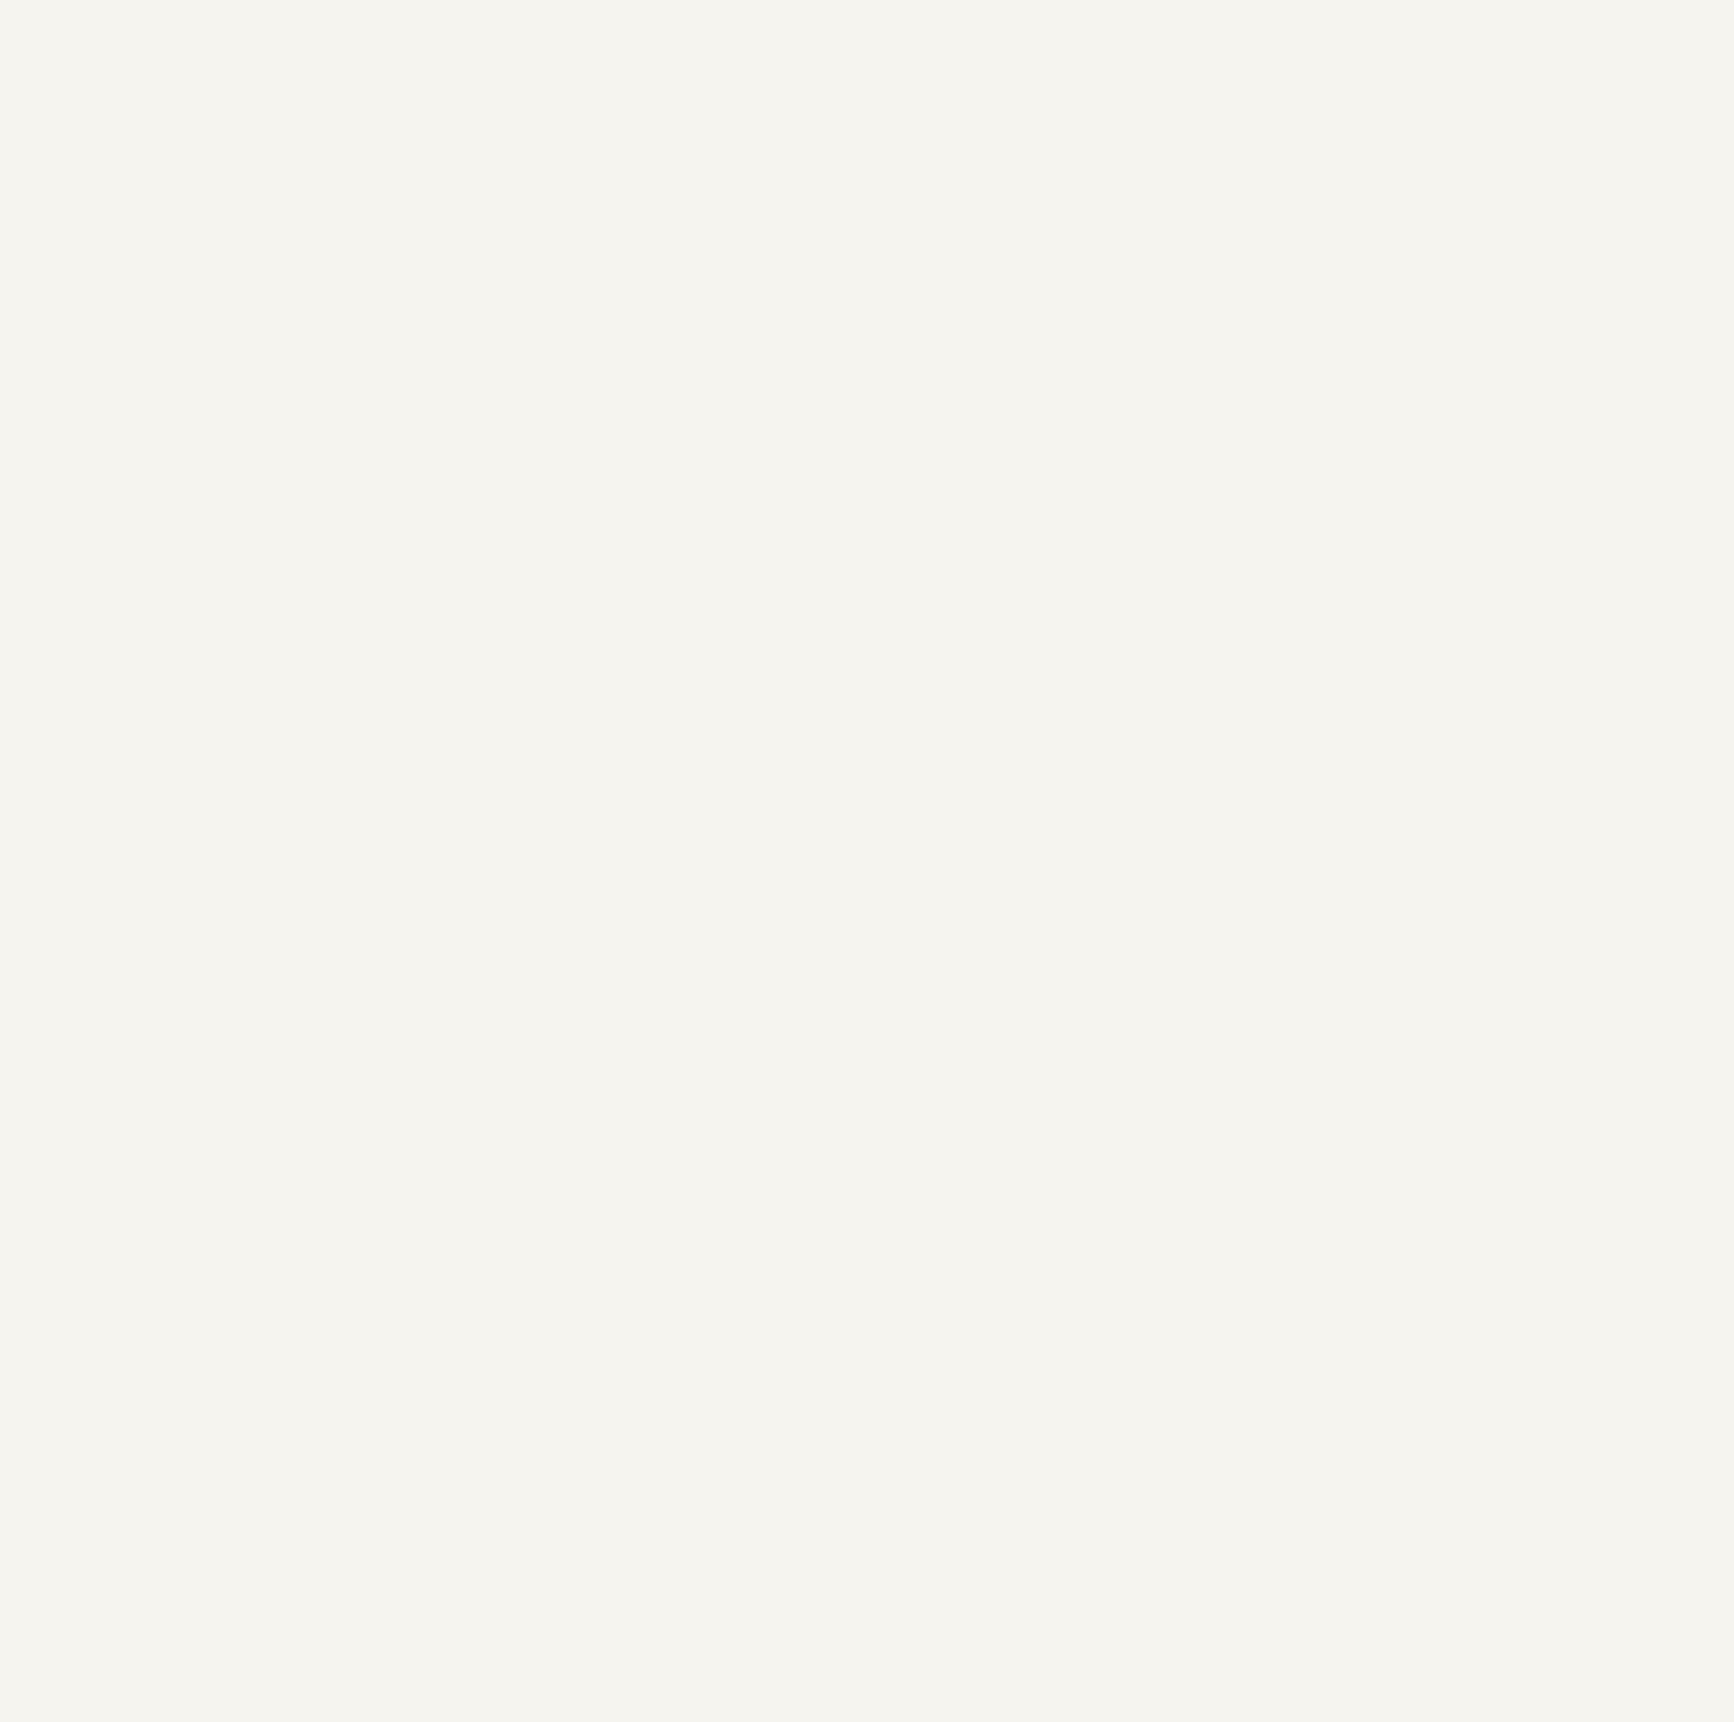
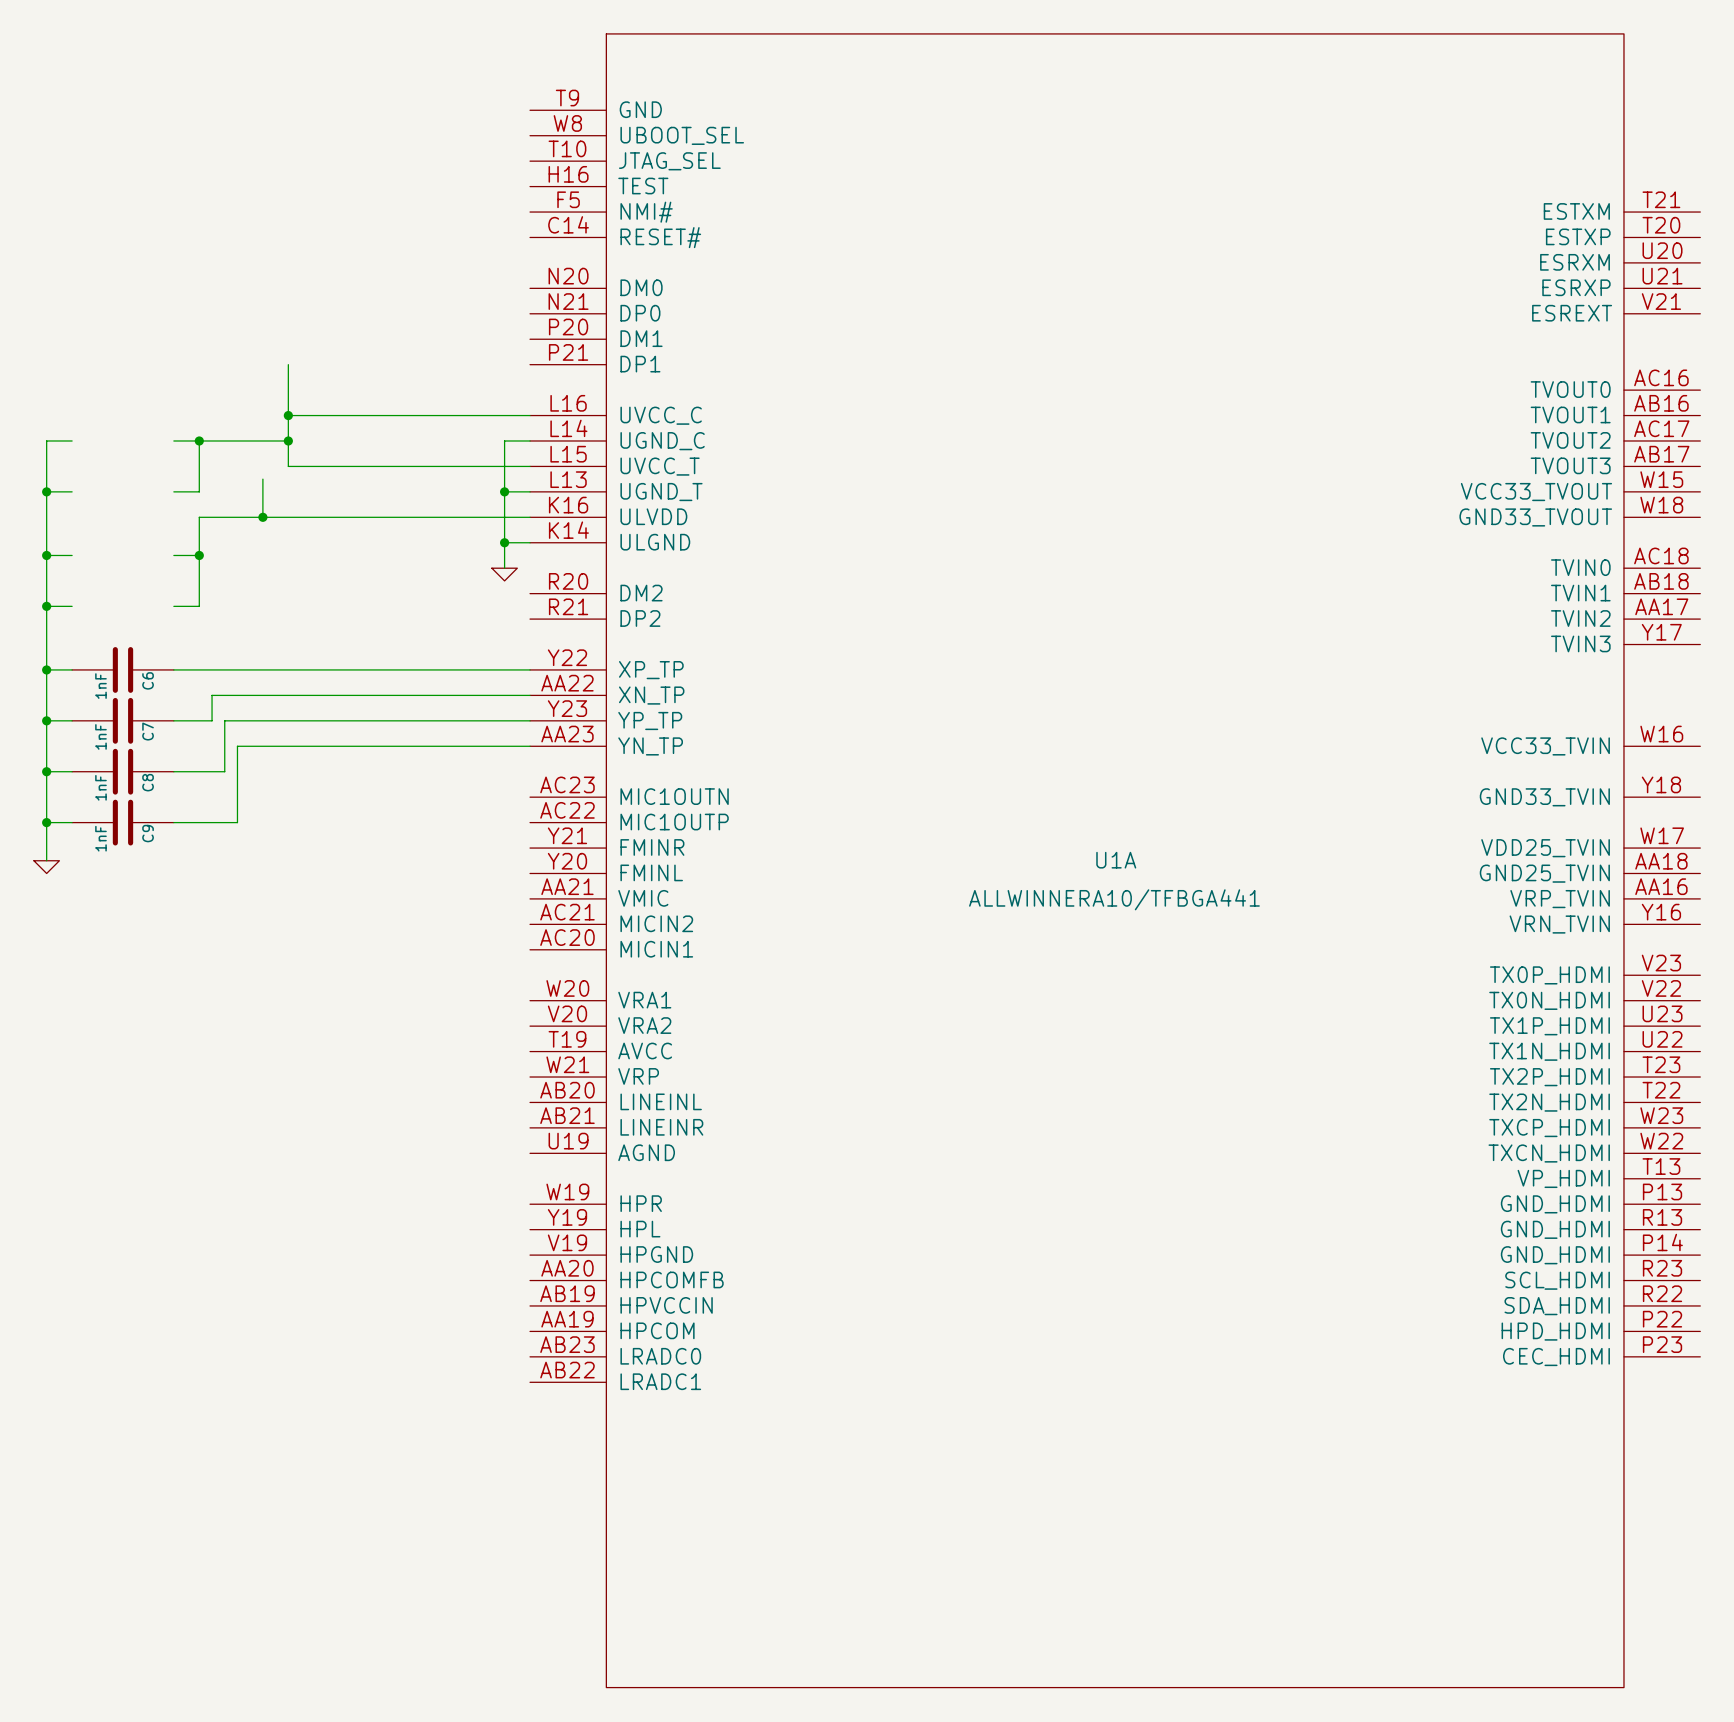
wire: none -> (288, 364) (288, 466) (530, 466)
wire: none -> (288, 415) (530, 415)
junction: none -> (288, 415)
wire: none -> (72, 440) (46, 440) (46, 860)
wire: none -> (173, 440) (288, 440)
wire: none -> (199, 440) (199, 491) (173, 491)
junction: none -> (199, 440)
junction: none -> (288, 440)
wire: none -> (530, 440) (504, 440) (504, 568)
wire: none -> (262, 479) (262, 517)
wire: none -> (46, 491) (72, 491)
junction: none -> (46, 491)
wire: none -> (504, 491) (530, 491)
junction: none -> (504, 491)
junction: none -> (262, 517)
wire: none -> (530, 517) (199, 517) (199, 606) (173, 606)
wire: none -> (504, 542) (530, 542)
junction: none -> (504, 542)
wire: none -> (46, 555) (72, 555)
junction: none -> (46, 555)
wire: none -> (173, 555) (199, 555)
junction: none -> (199, 555)
power symbol: none -> (504, 574)
wire: none -> (46, 606) (72, 606)
junction: none -> (46, 606)
wire: none -> (46, 669) (72, 669)
junction: none -> (46, 669)
C6: none -> 1nF (122, 669)
wire: none -> (173, 669) (530, 669)
wire: none -> (530, 695) (212, 695) (212, 720) (173, 720)
wire: none -> (46, 720) (72, 720)
junction: none -> (46, 720)
C7: none -> 1nF (122, 720)
wire: none -> (530, 720) (224, 720) (224, 771) (173, 771)
wire: none -> (530, 746) (237, 746) (237, 822) (173, 822)
wire: none -> (46, 771) (72, 771)
junction: none -> (46, 771)
C8: none -> 1nF (122, 771)
wire: none -> (46, 822) (72, 822)
junction: none -> (46, 822)
C9: none -> 1nF (122, 822)
U1A: none -> ALLWINNERA10/TFBGA441 (1115, 860)
power symbol: none -> (46, 867)

